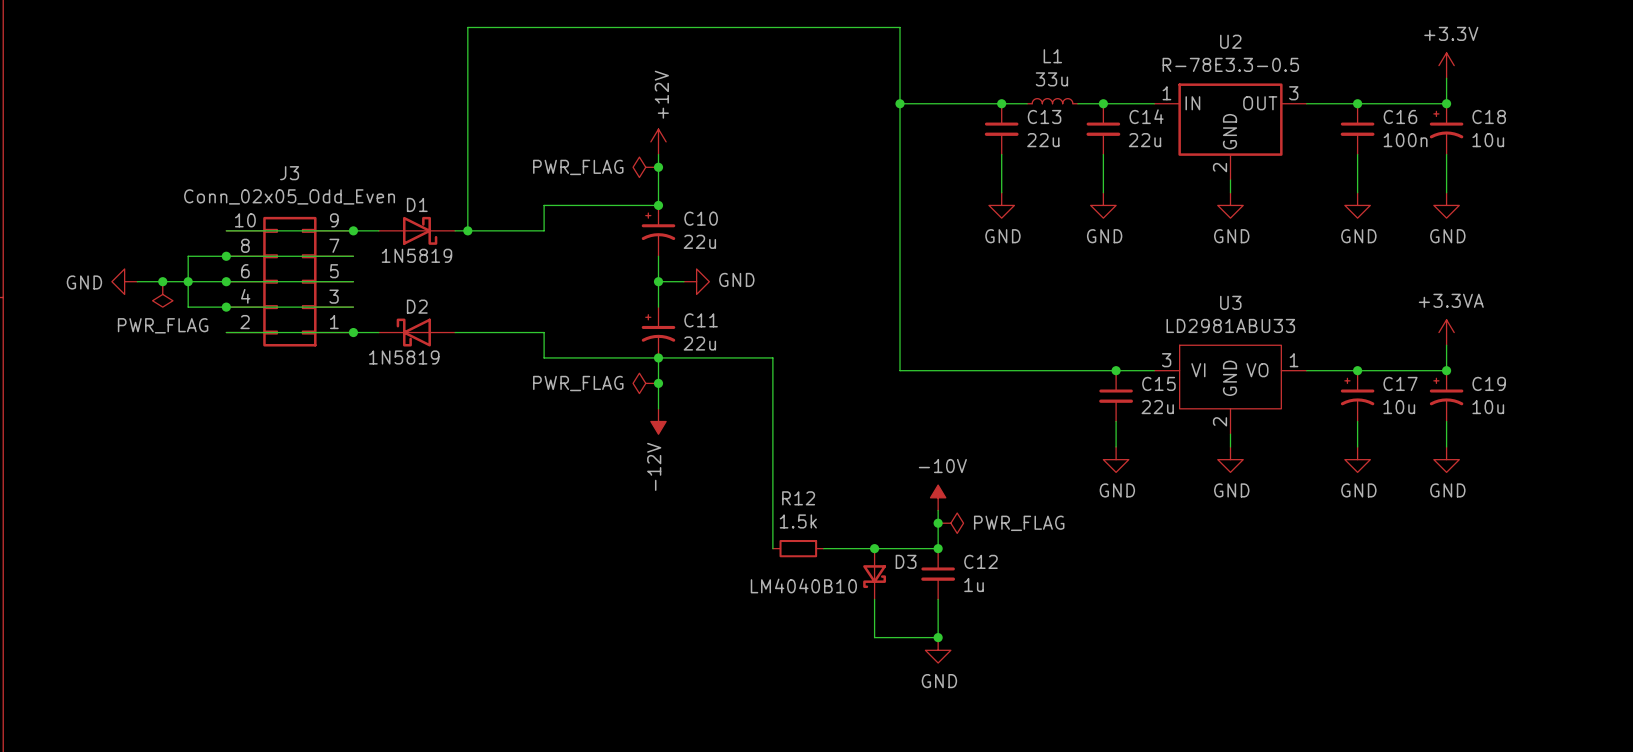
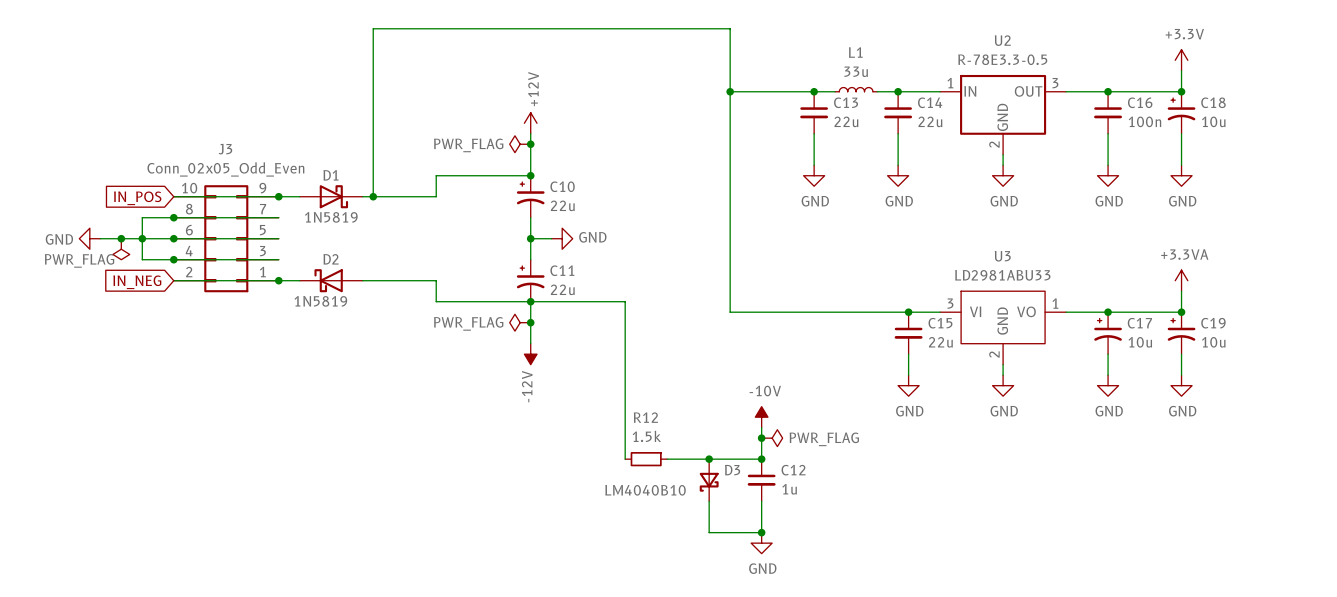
global label: none -> IN_POS (137, 198)
power symbol text position: PWR_FLAG (163, 325) -> PWR_FLAG (79, 260)
global label: none -> IN_NEG (137, 282)

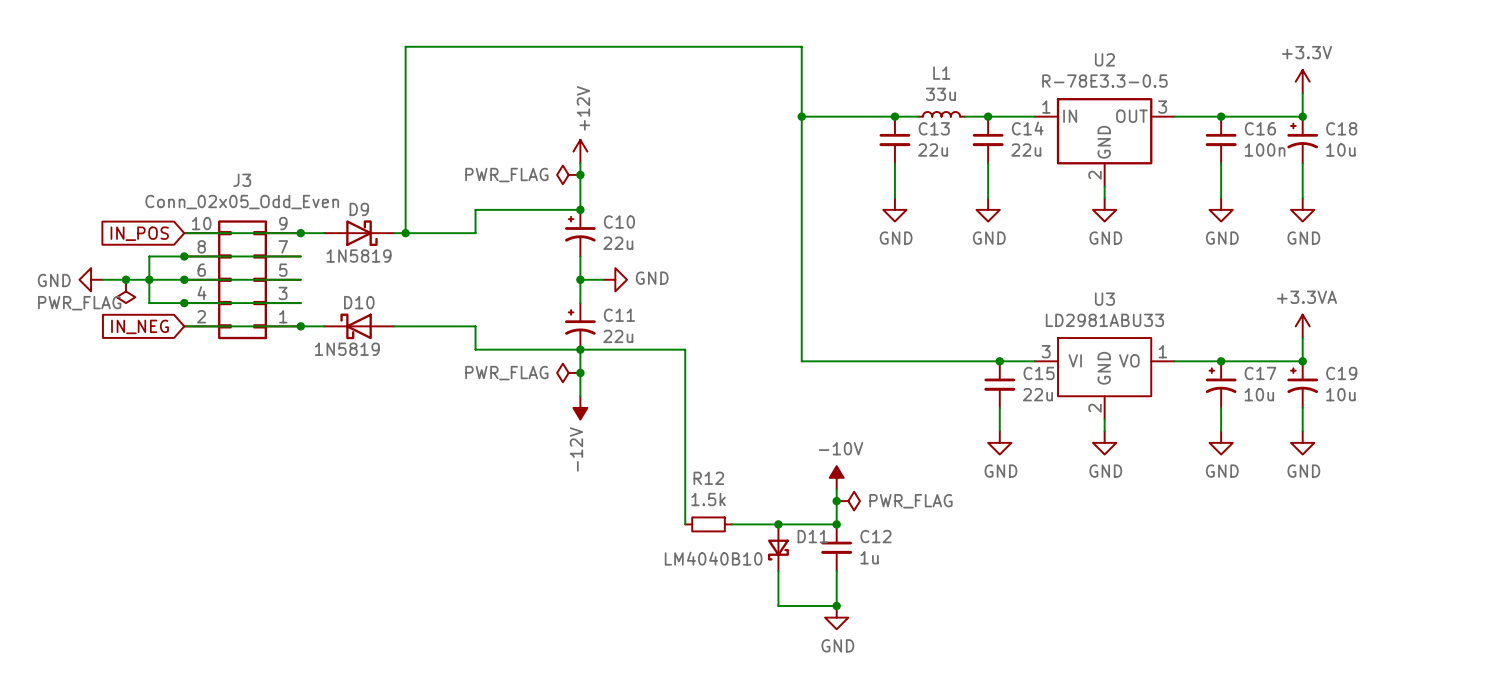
D1 name: D1 (330, 175) -> D9 (359, 209)
D2 name: D2 (331, 259) -> D10 (359, 302)
D3 name: D3 (732, 470) -> D11 (812, 536)

